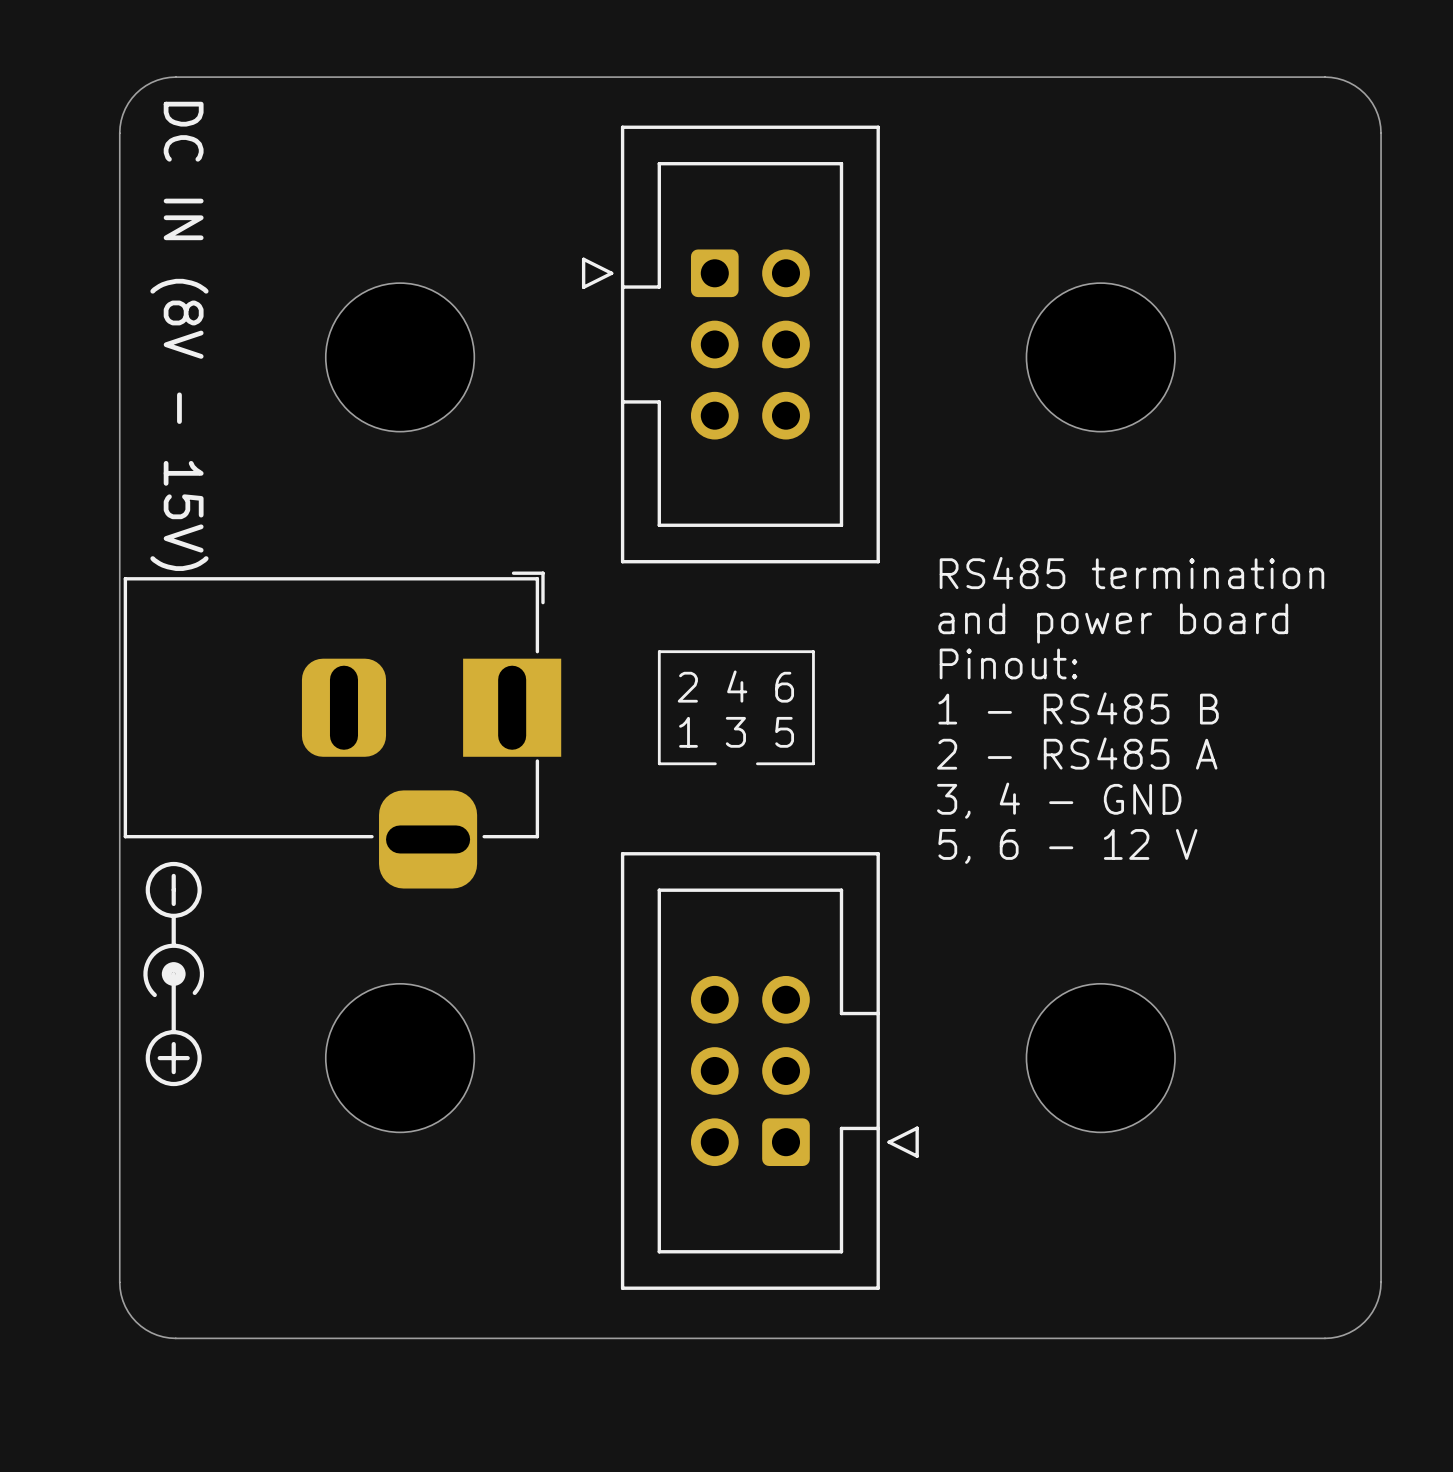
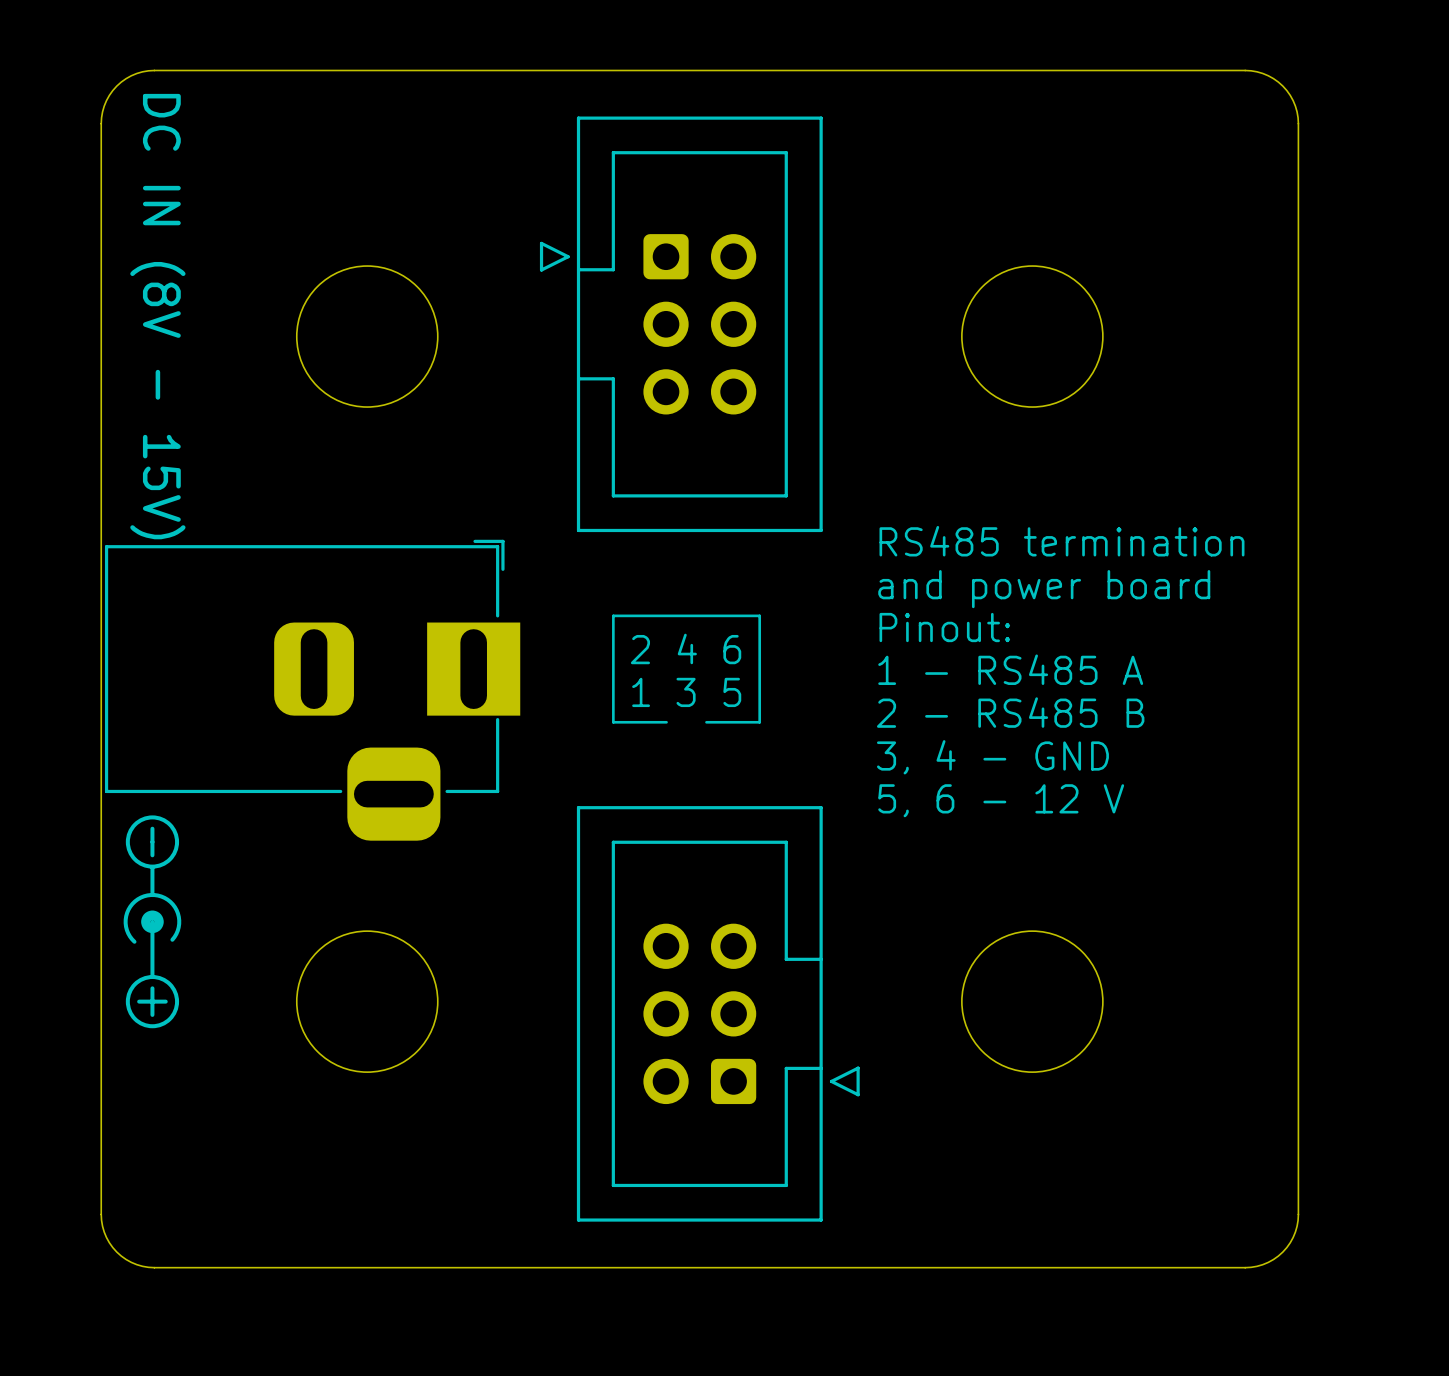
text: 1 - RS485 B (1078, 708) -> 1 - RS485 A (1010, 669)
text: 2 - RS485 A (1077, 753) -> 2 - RS485 B (1010, 712)

